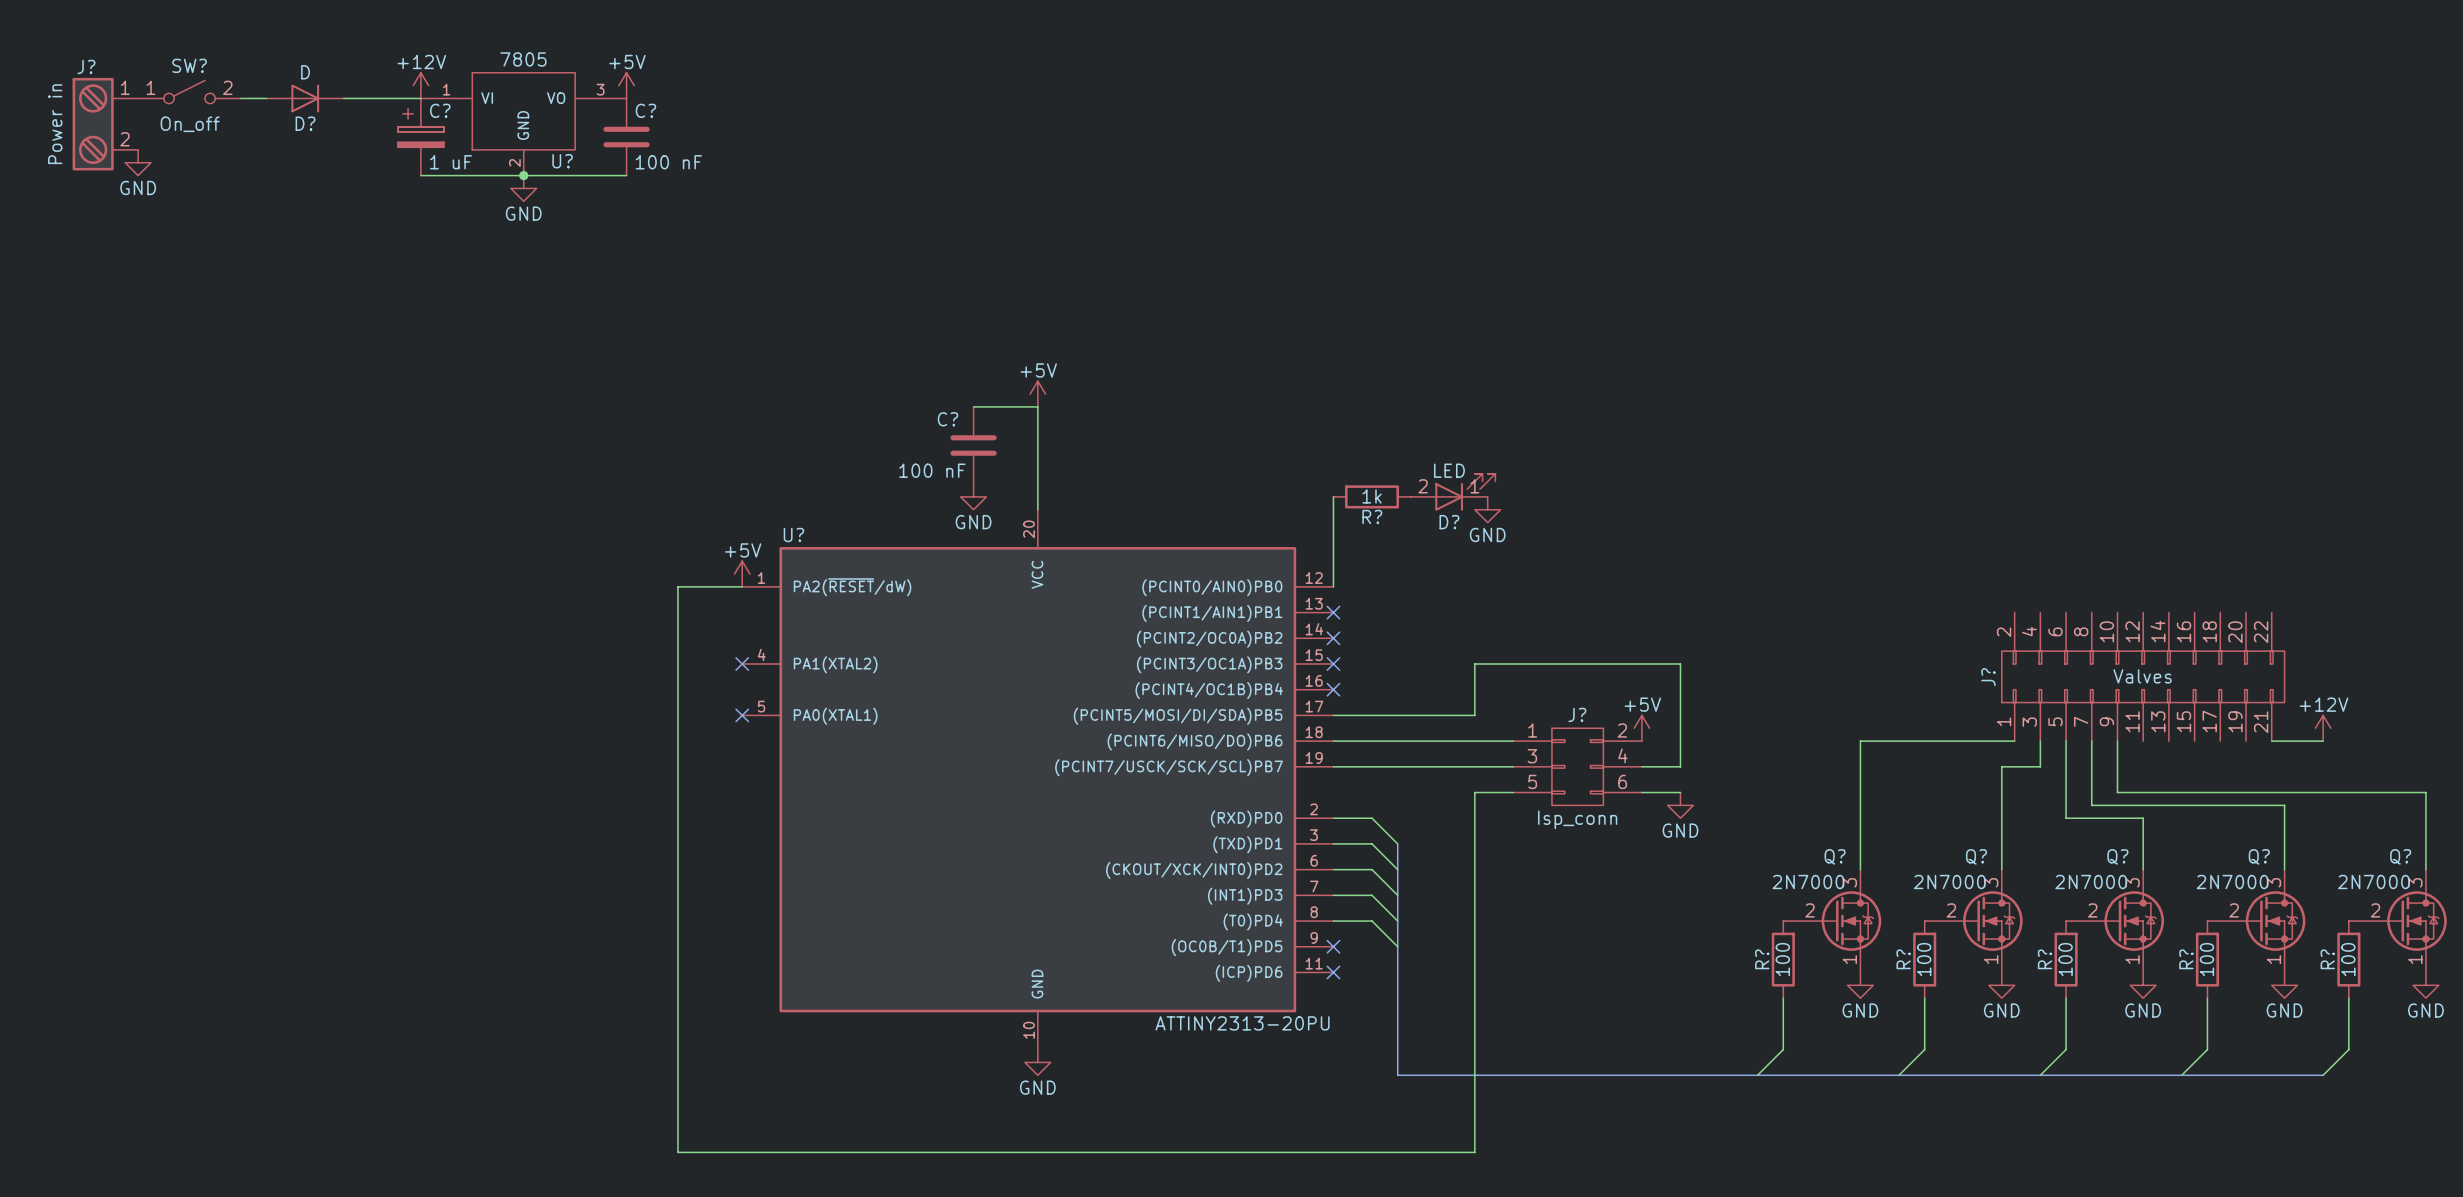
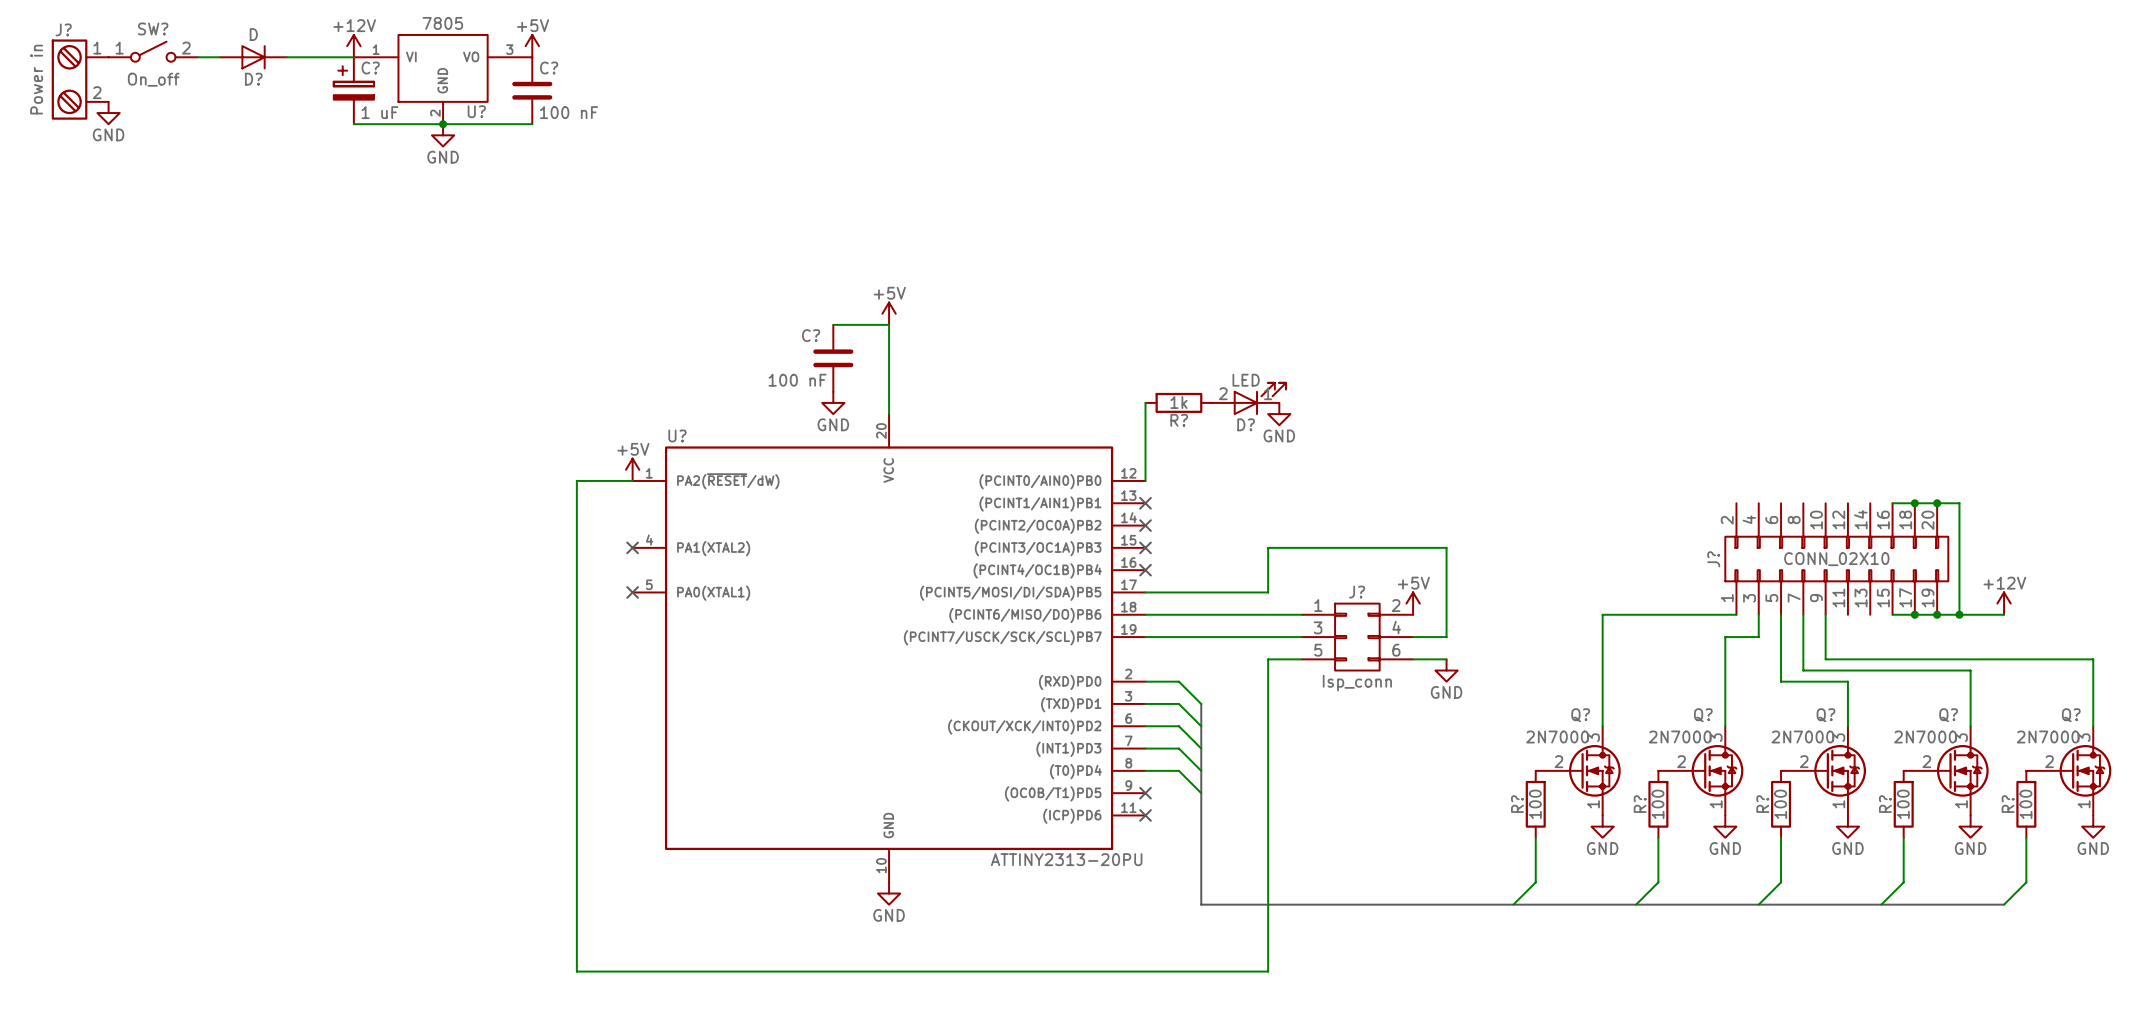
wire: none -> (1892, 503) (1959, 503) (1959, 614) (1892, 614)
junction: none -> (1914, 503)
junction: none -> (1937, 503)
J?: none -> CONN_02X10 (1836, 559)
J?: Valves (2143, 676) -> none
junction: none -> (1914, 614)
junction: none -> (1937, 614)
junction: none -> (1959, 614)

